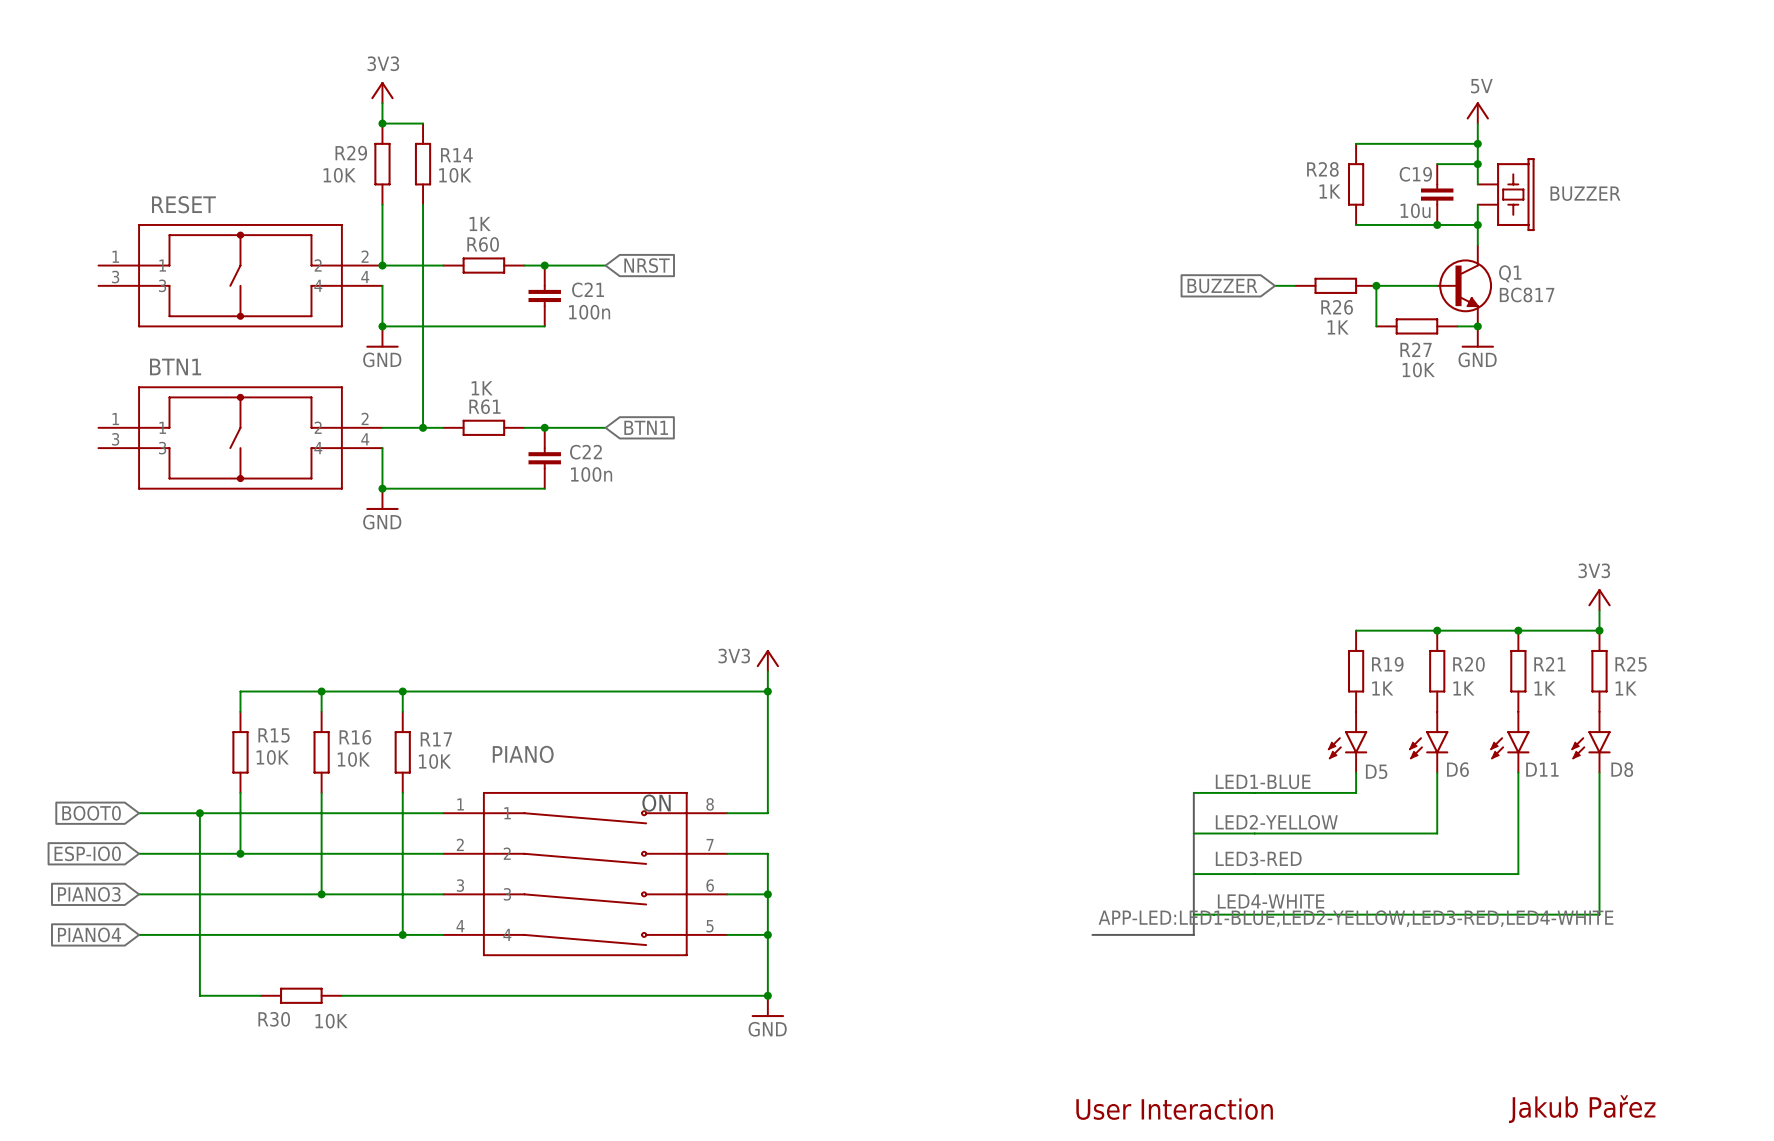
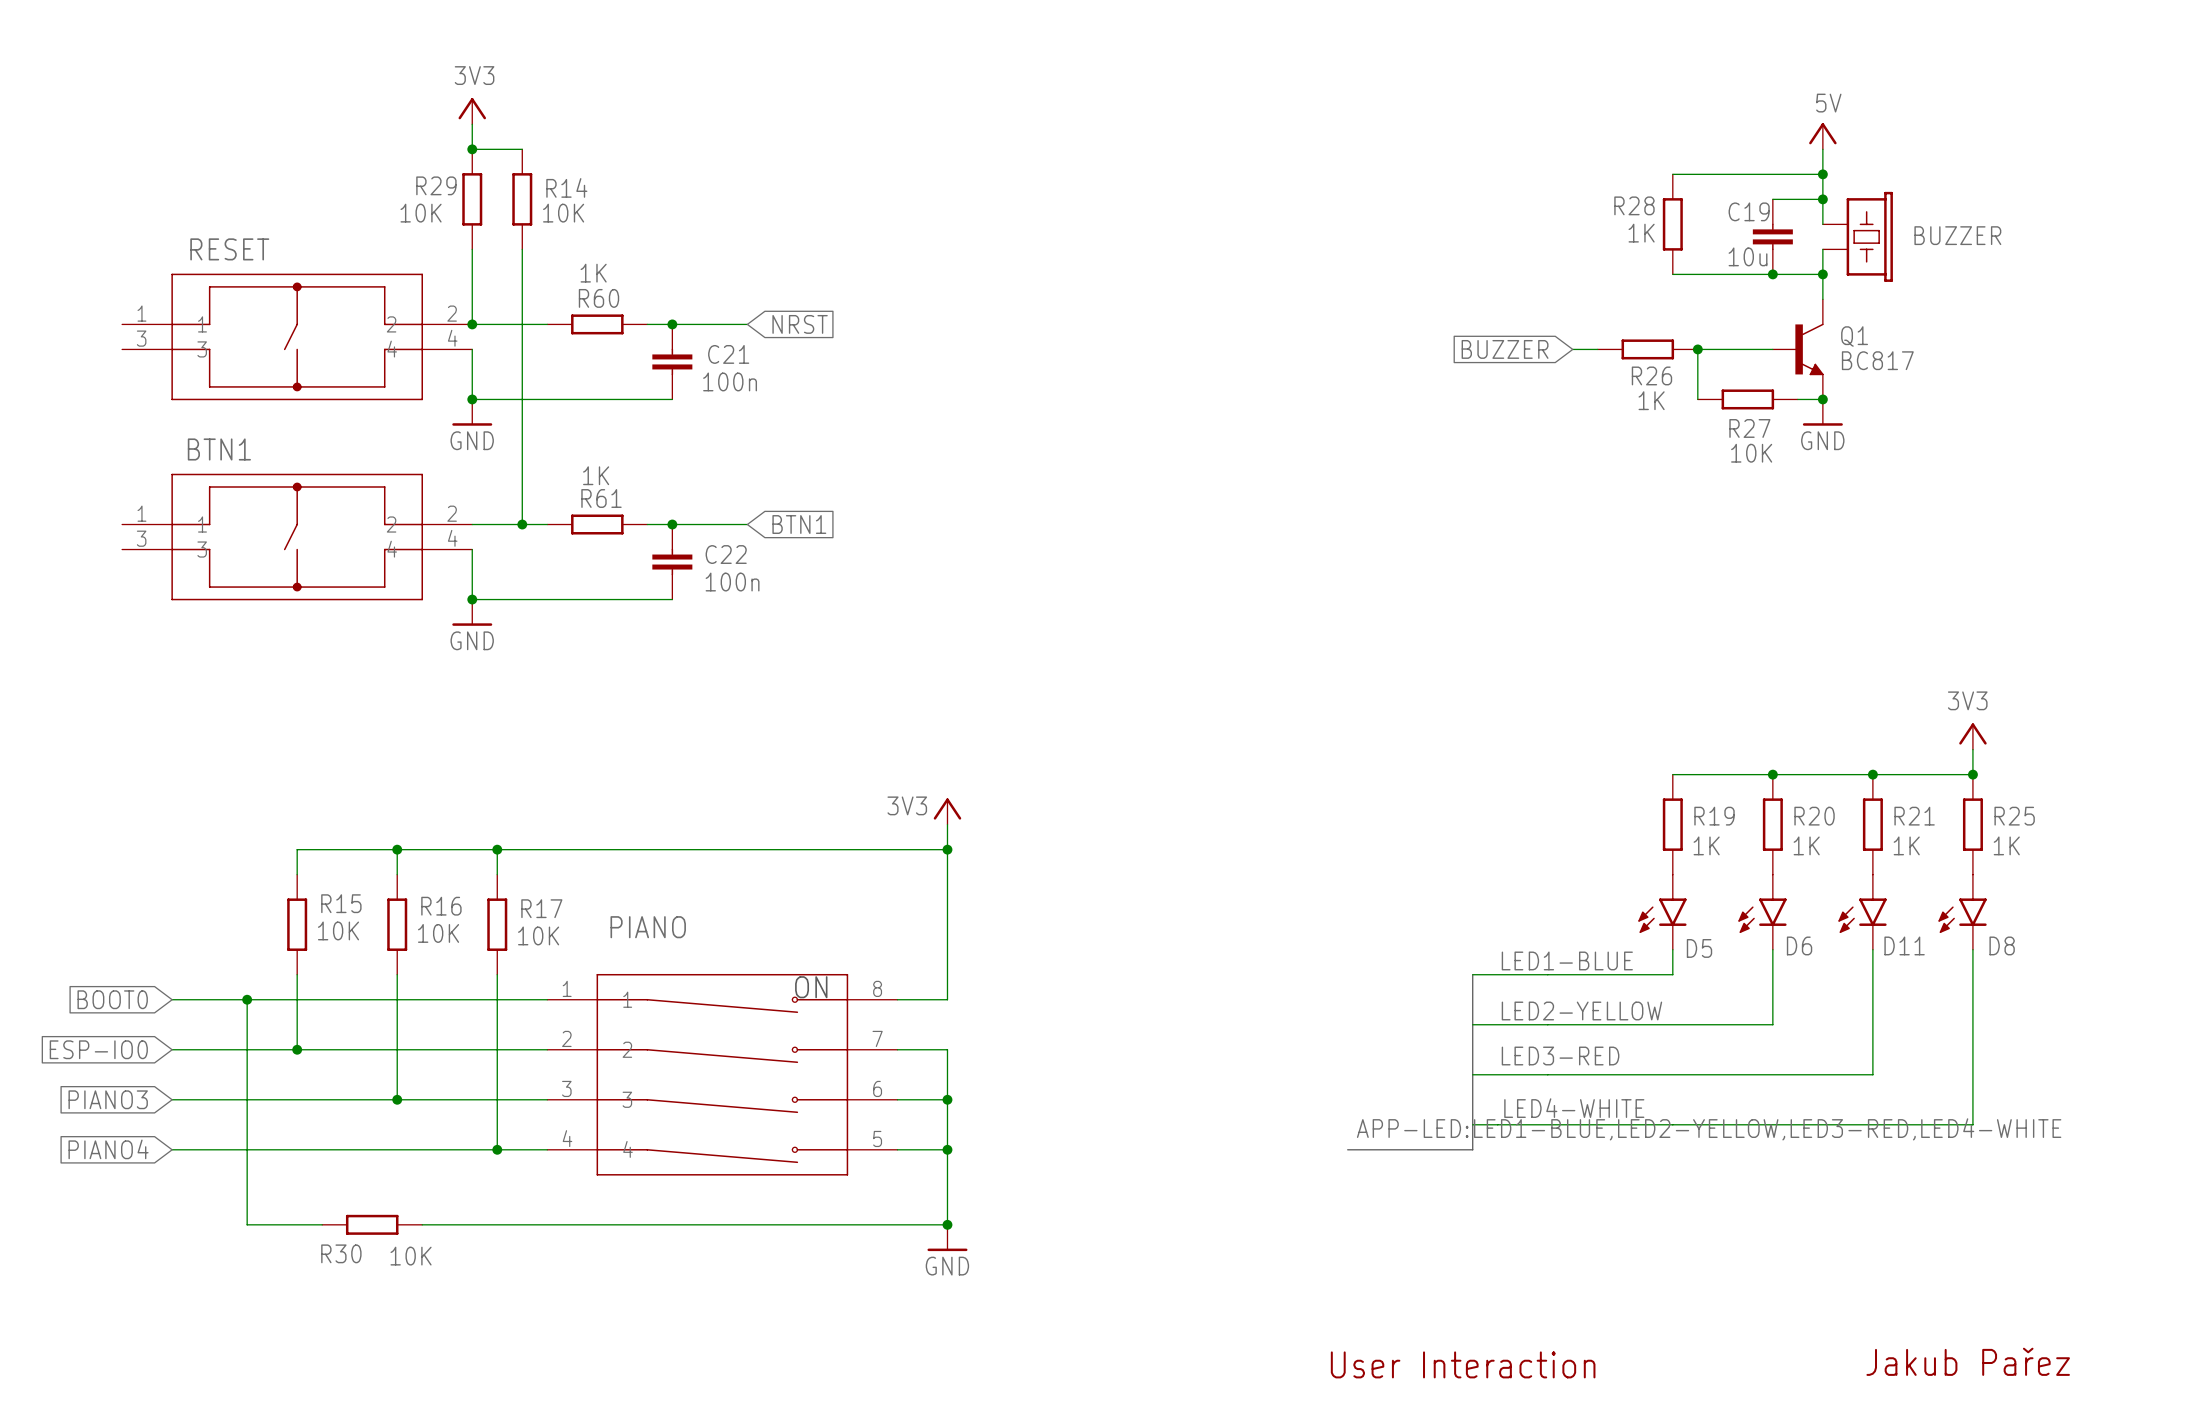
Q1 symbol: [1437, 245, 1493, 327] -> [1772, 299, 1824, 400]

